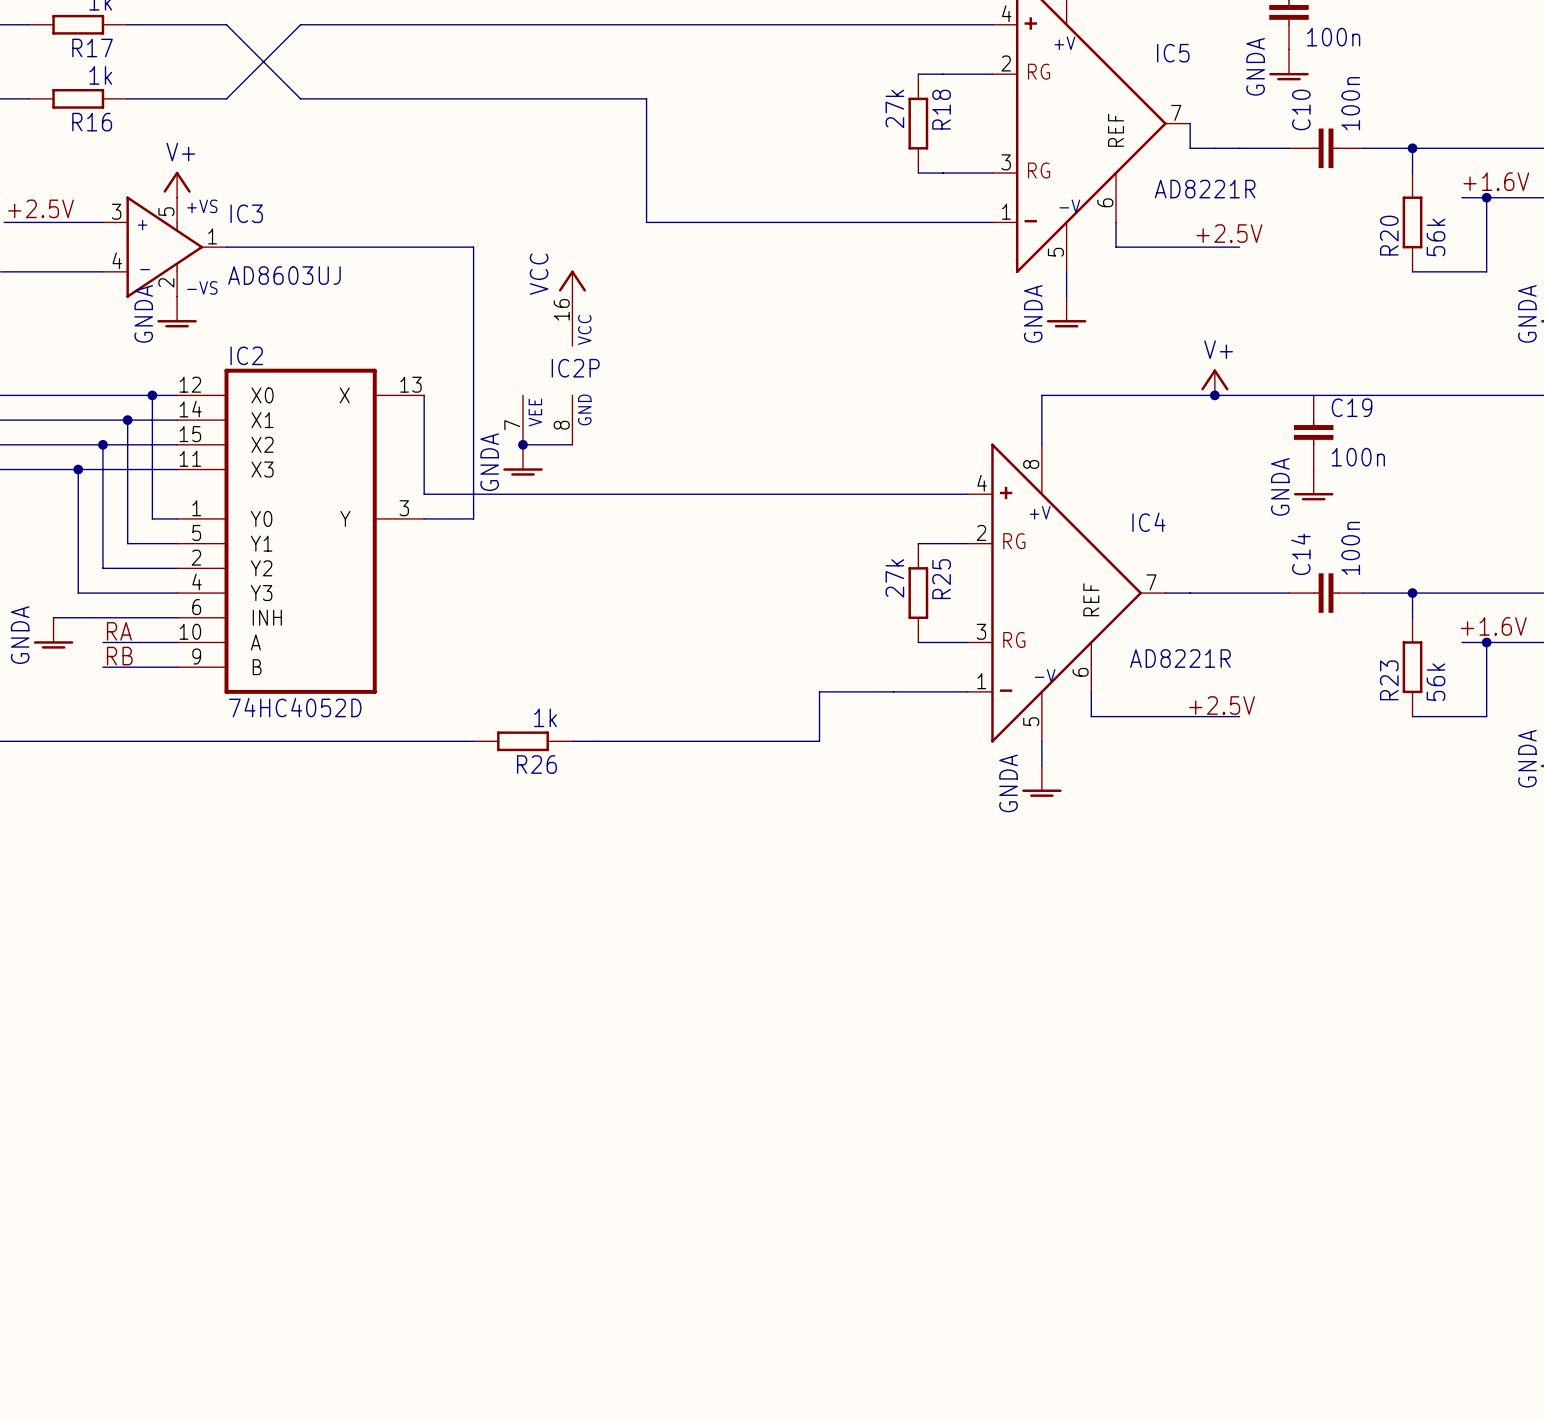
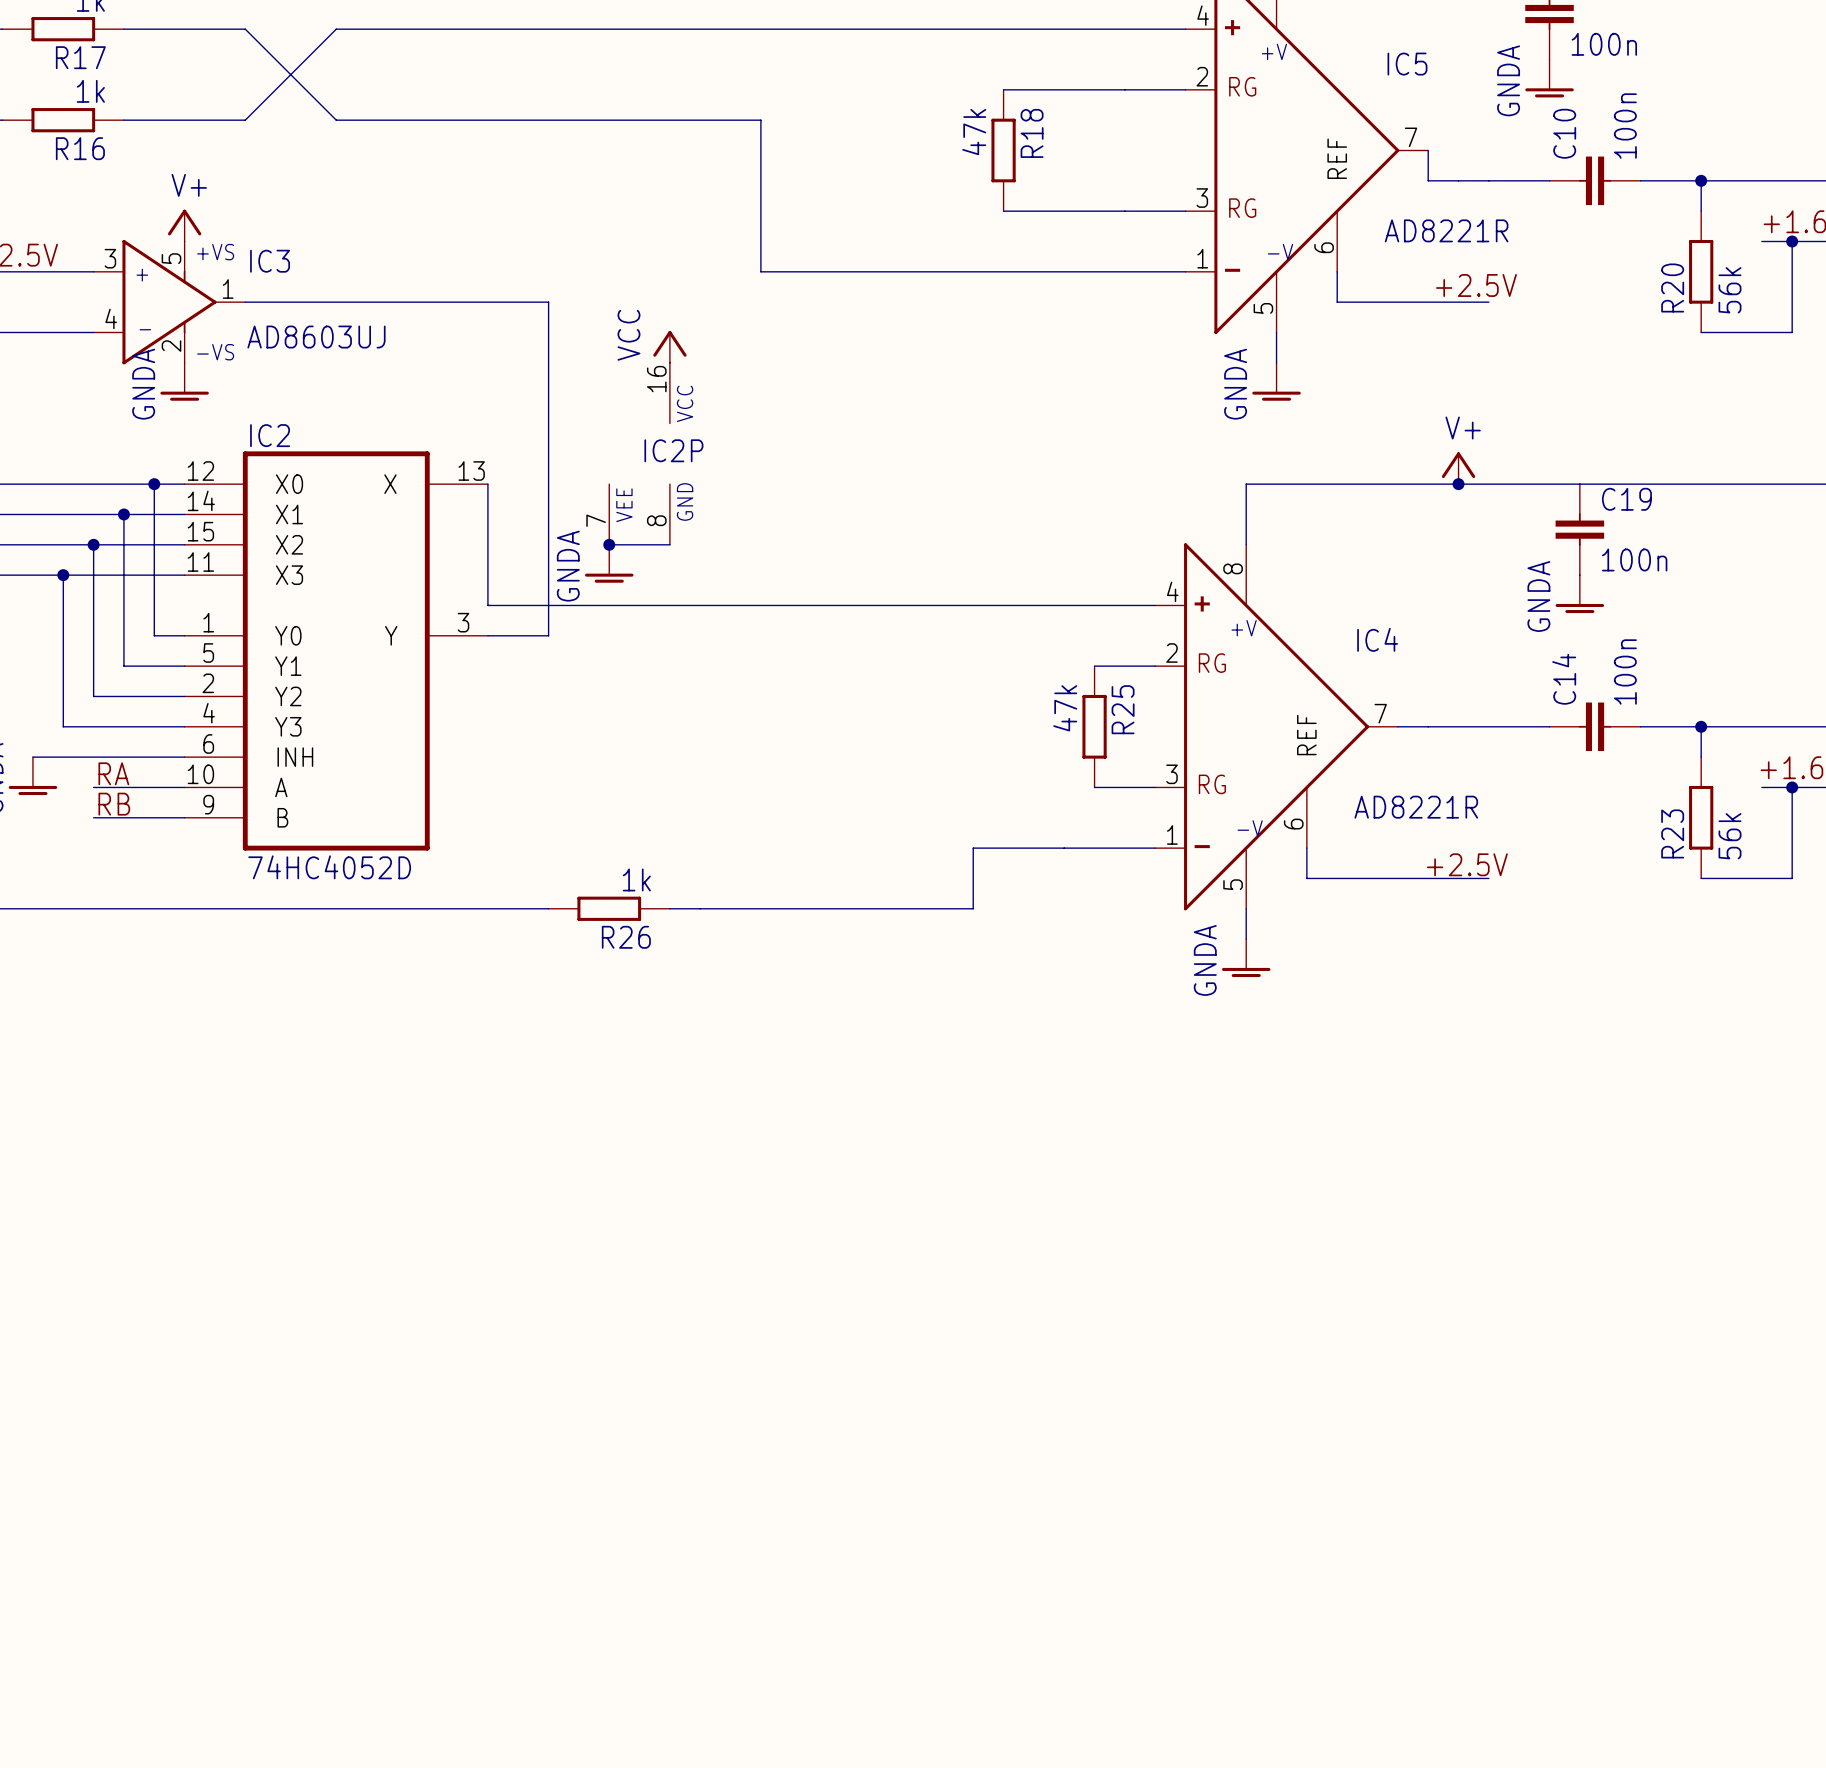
wire: none -> (1003, 89) (1094, 89)
R18 value: 27k (894, 108) -> 47k (974, 132)
R18 position: (918, 123) -> (1003, 150)
wire: none -> (1003, 211) (1094, 211)
R25 value: 27k (894, 578) -> 47k (1065, 708)

